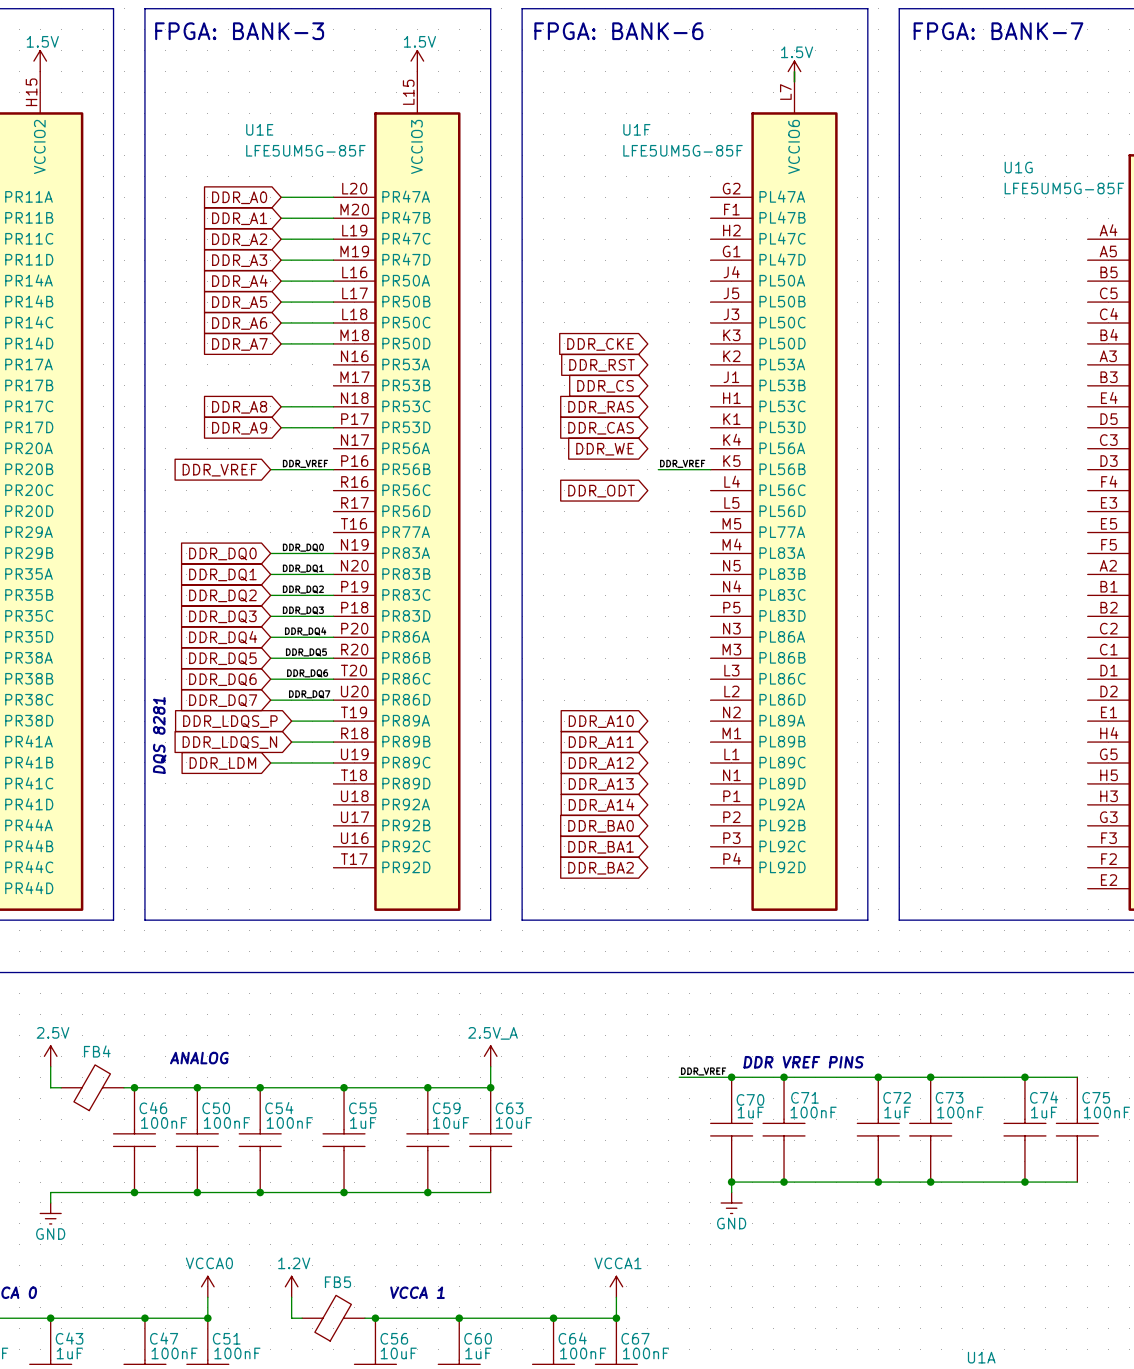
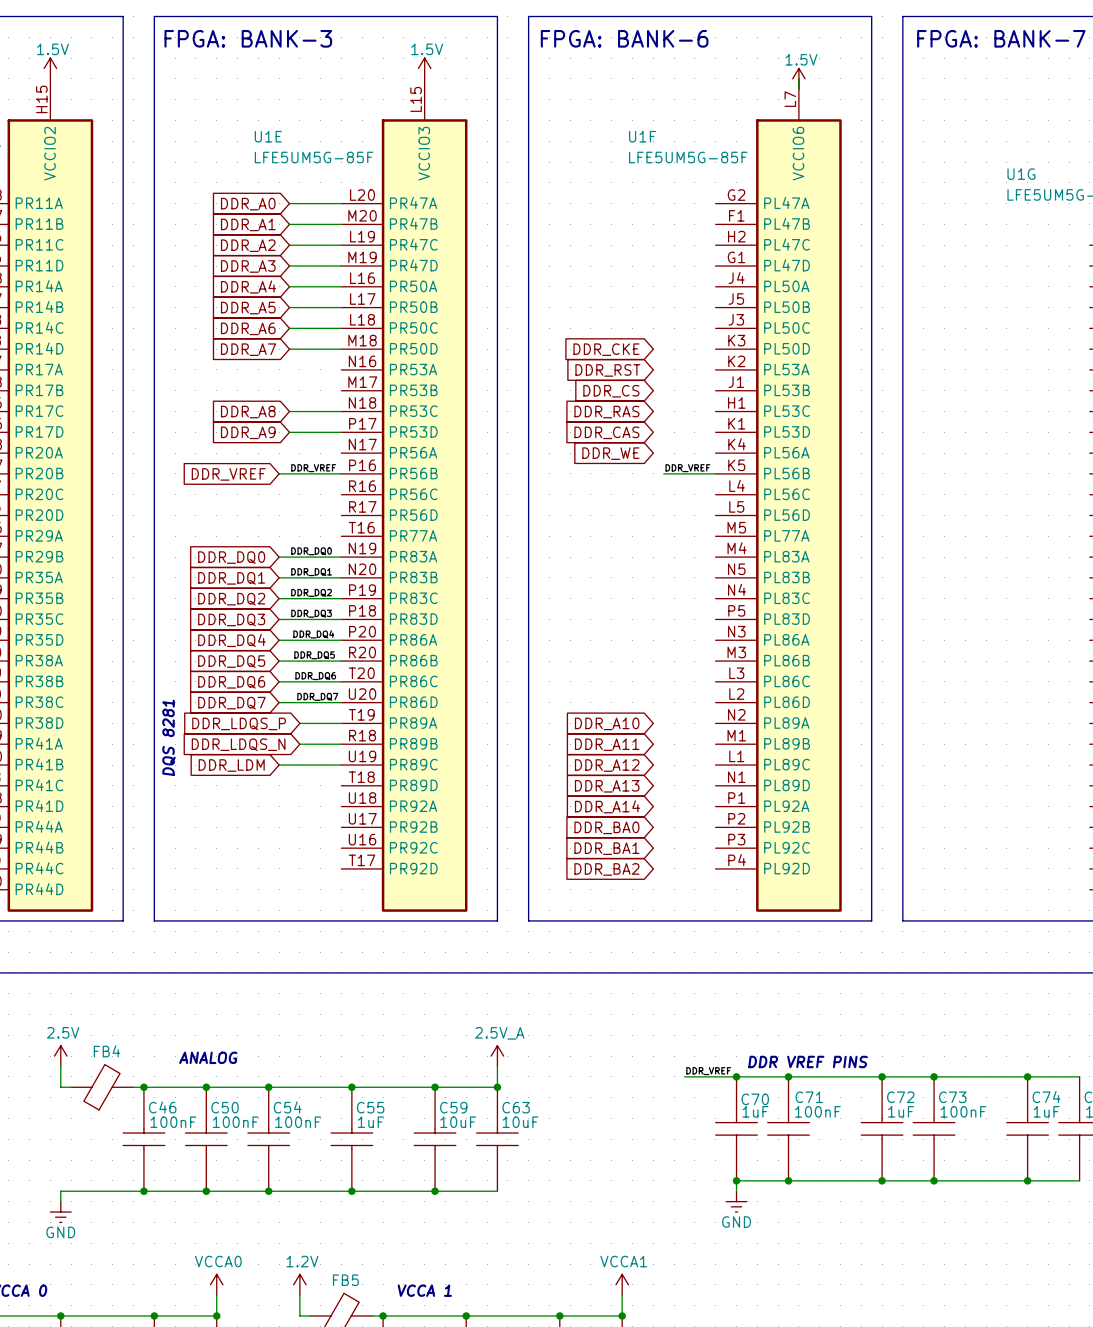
global label: DDR_ODT (601, 491) -> none

